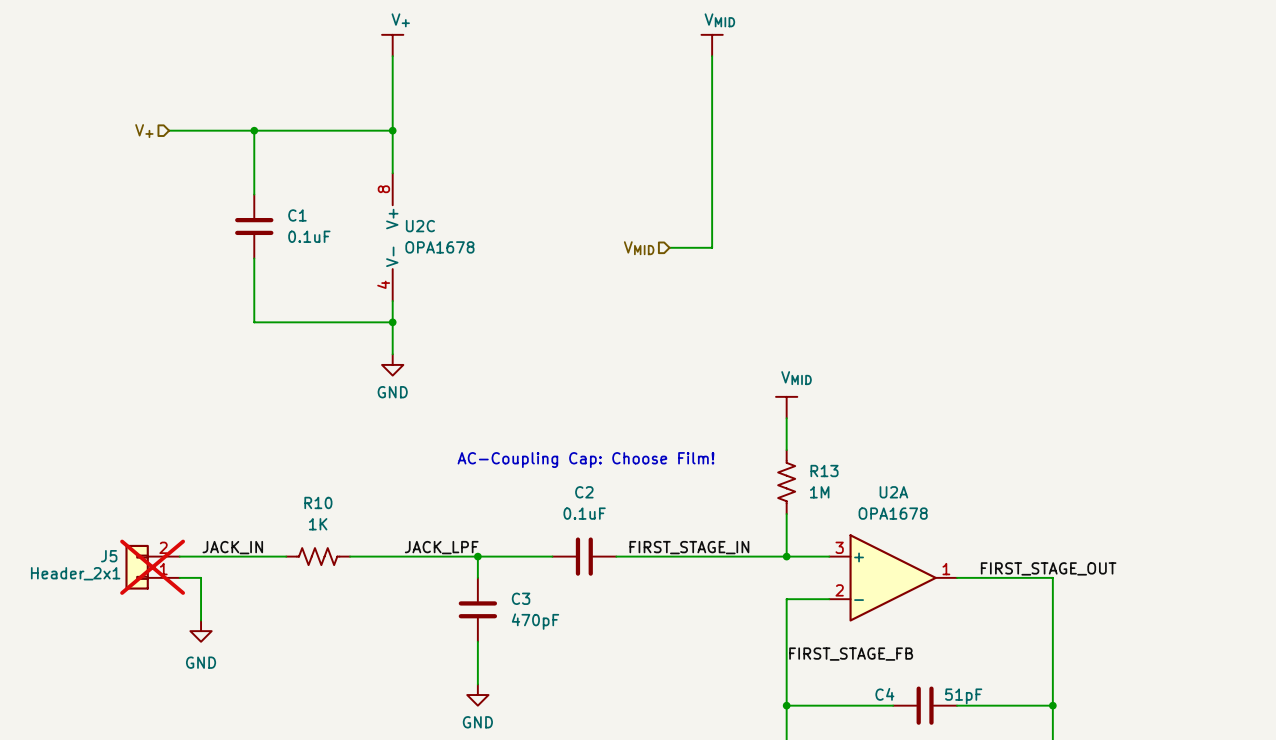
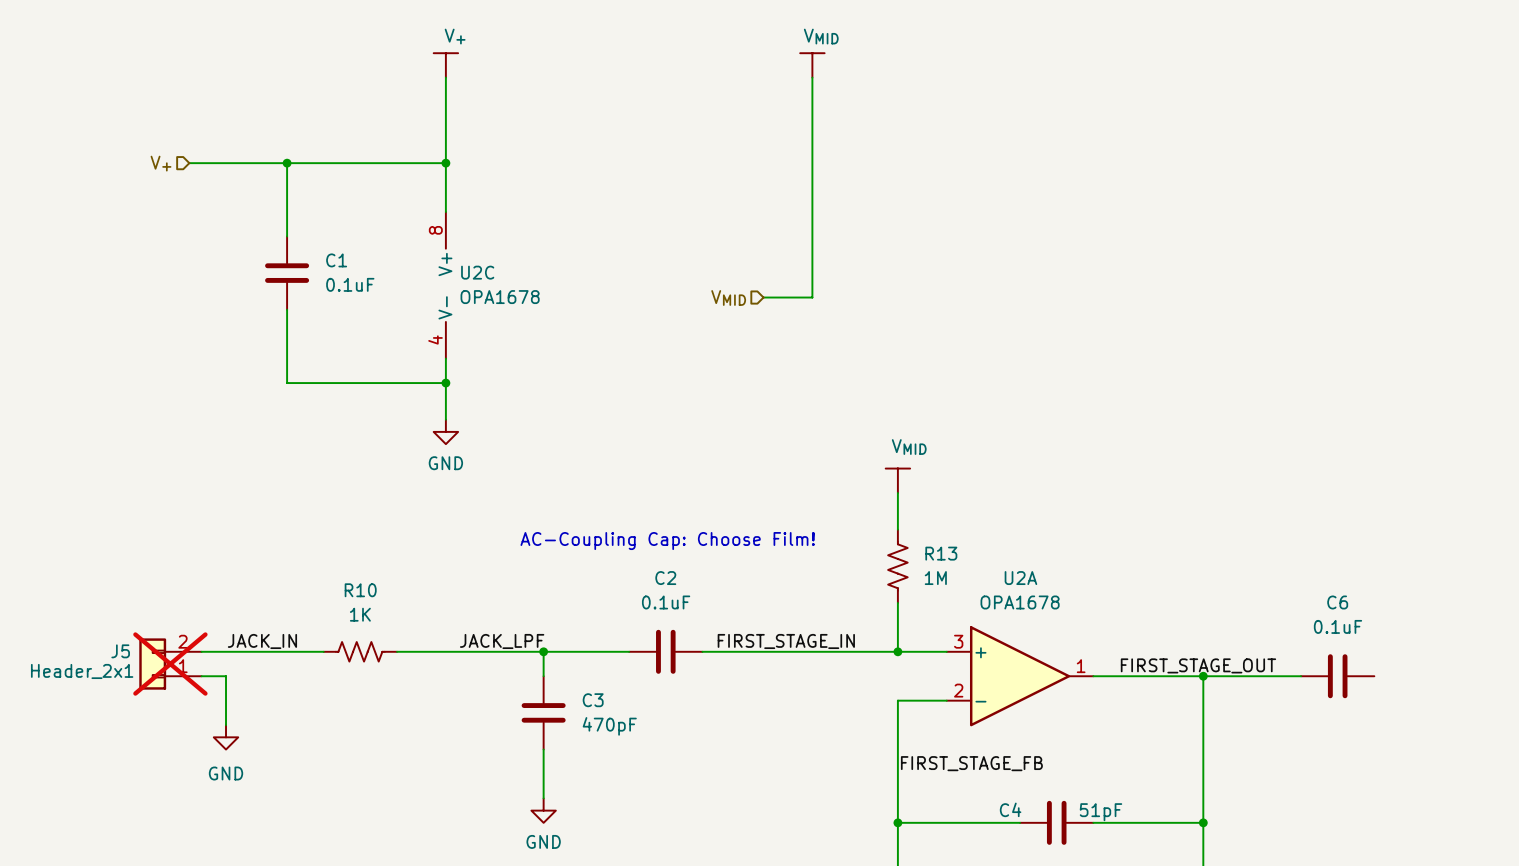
wire: none -> (1203, 676) (1301, 676)
junction: none -> (1203, 676)
C6: none -> 0.1uF (1337, 676)

